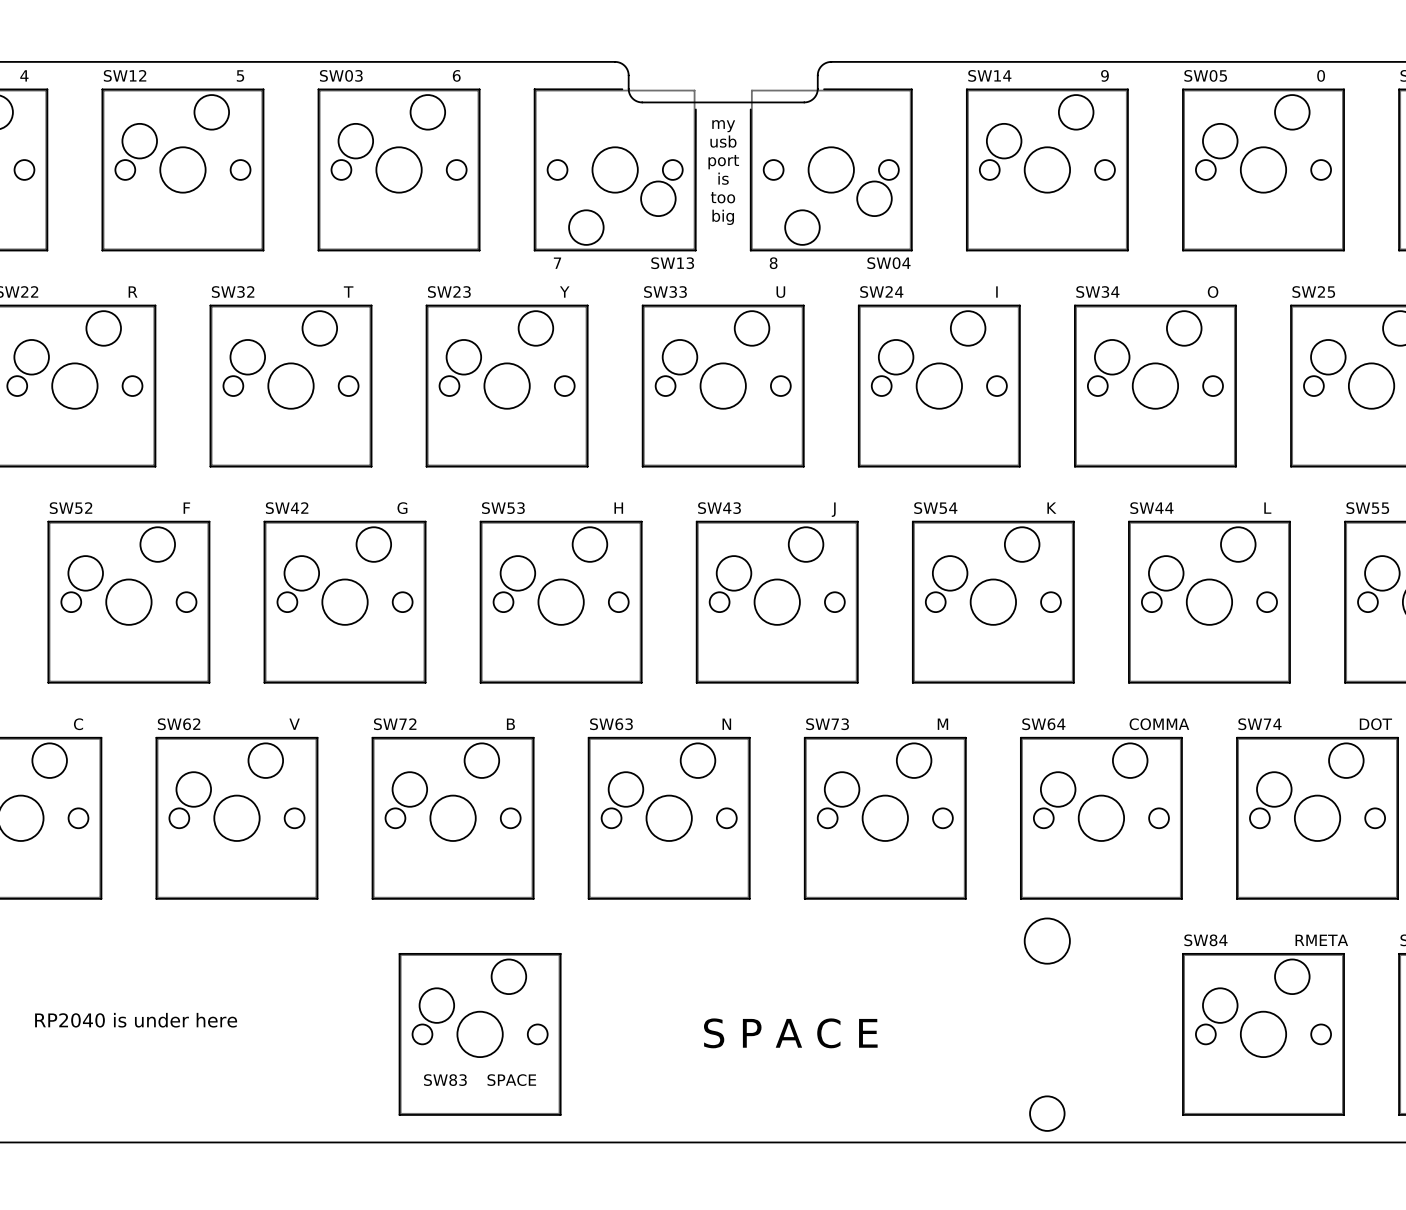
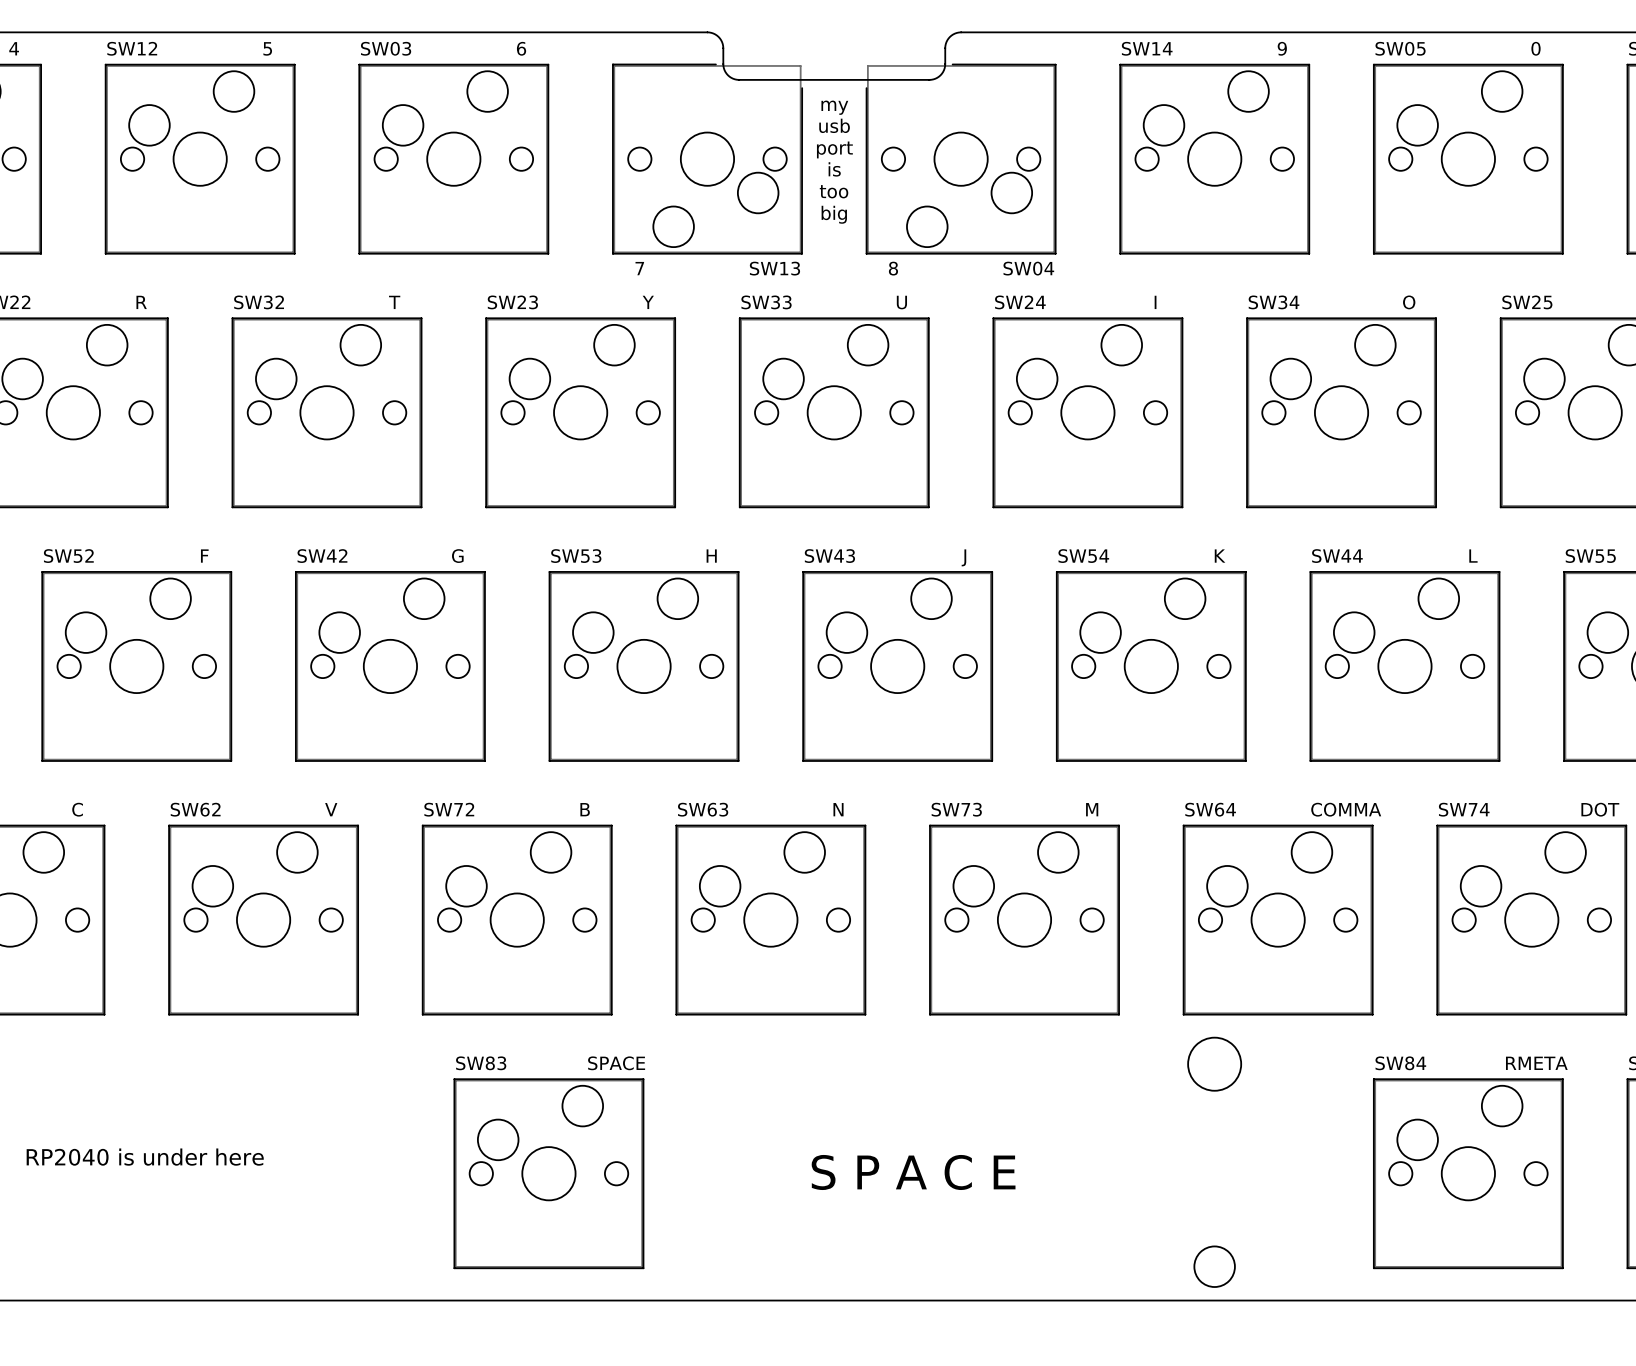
SW83 name position: SW83 (445, 1080) -> SW83 (481, 1063)
SW83 value position: SPACE (511, 1080) -> SPACE (616, 1063)

